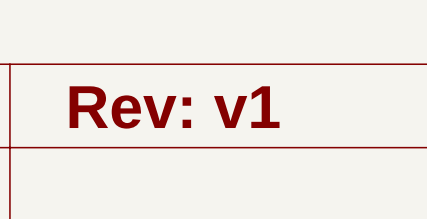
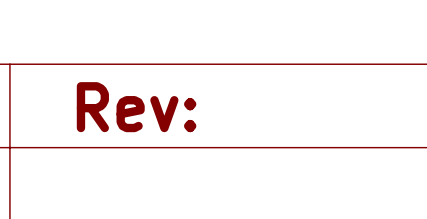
title block: Rev: v1 (174, 107) -> Rev: (136, 107)

